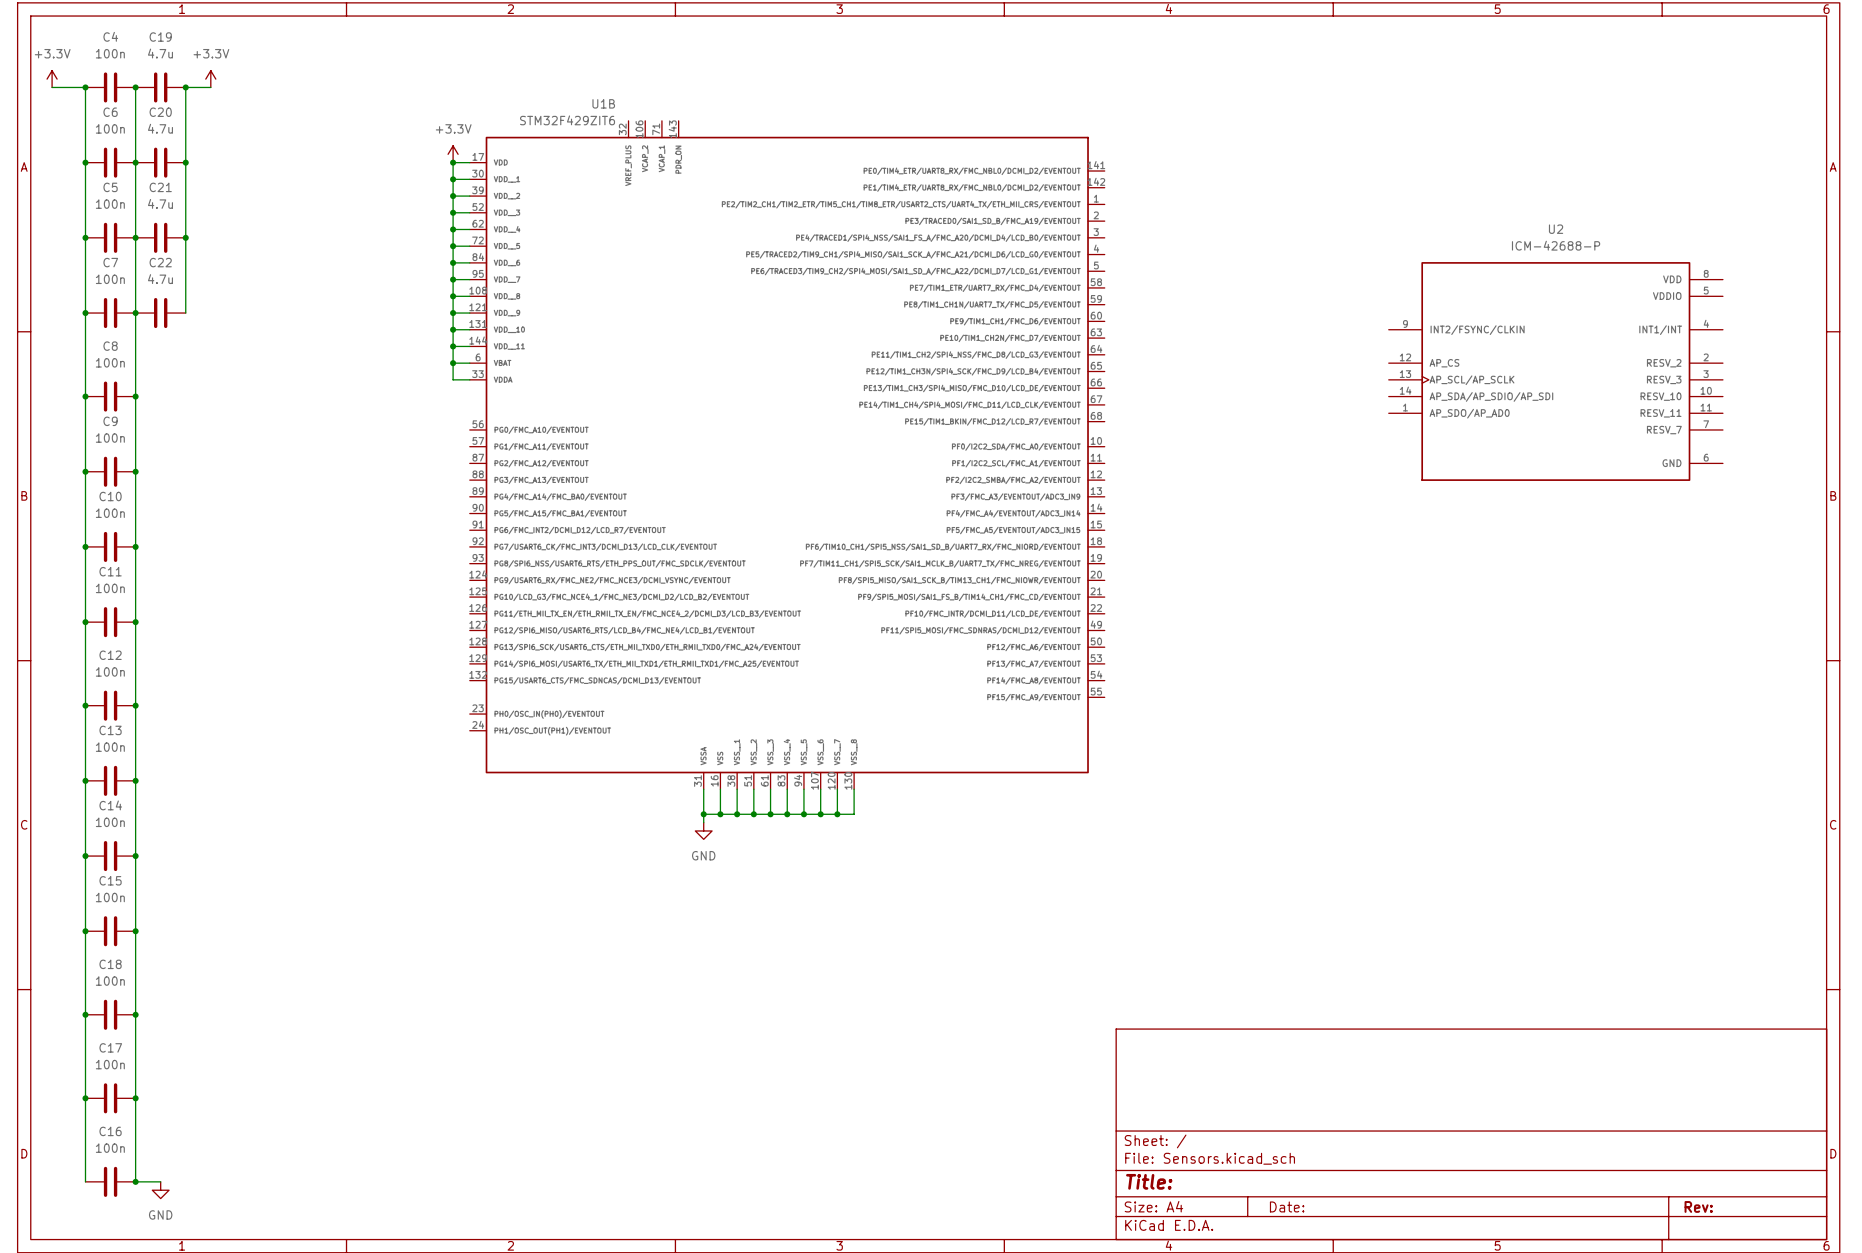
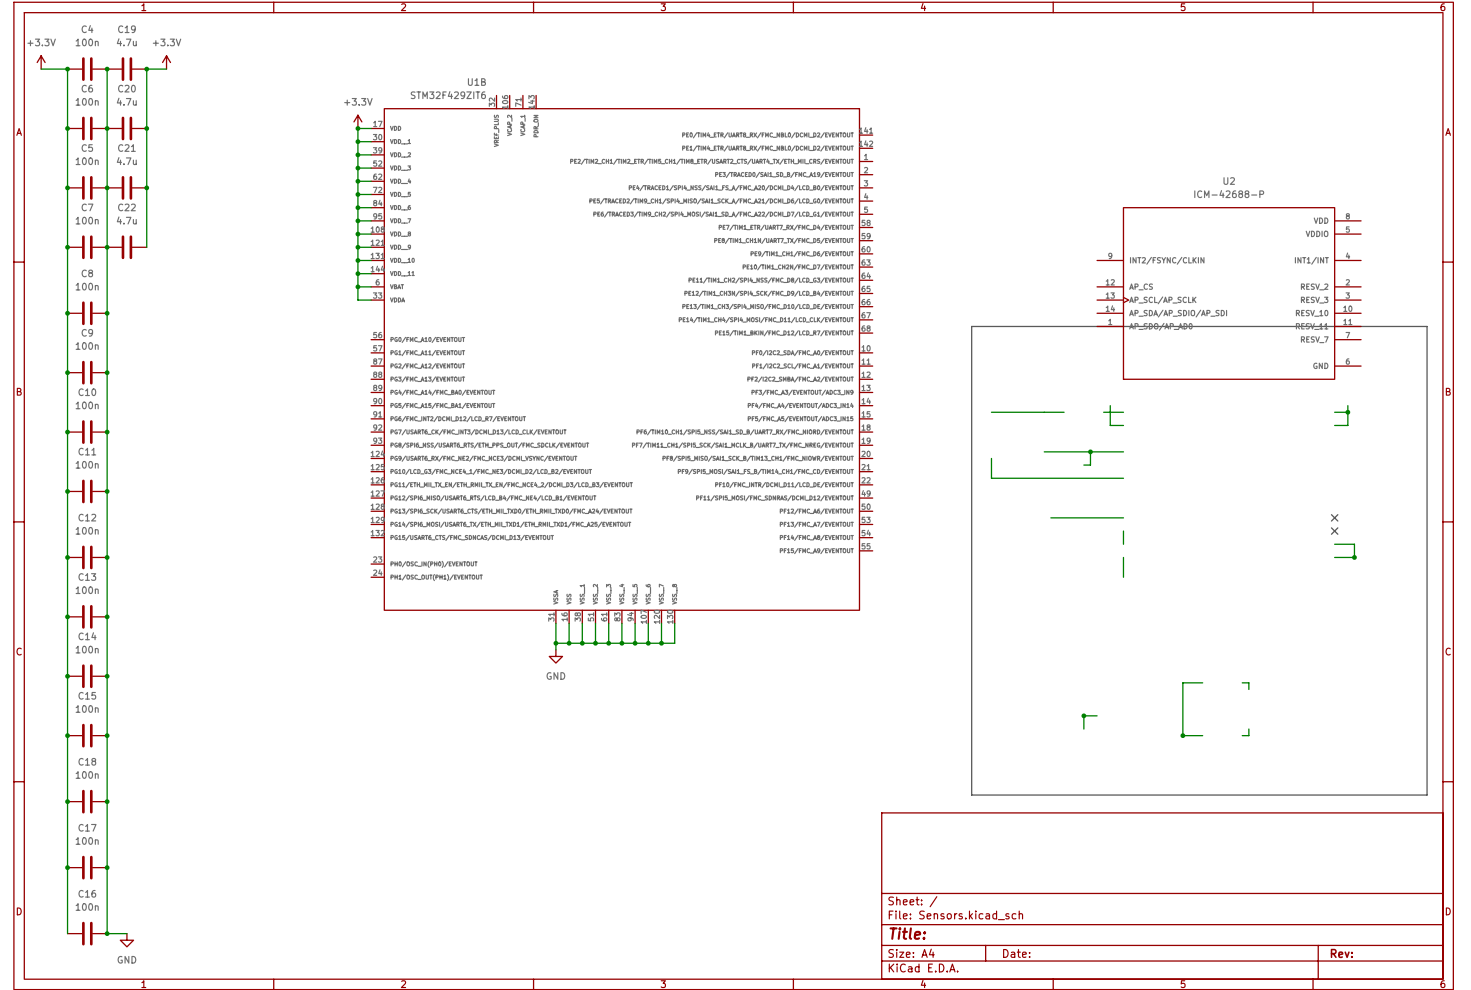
line: none -> (971, 326) (1427, 326) (1427, 795) (971, 795) (971, 326)
wire: none -> (1110, 405) (1110, 425) (1123, 425)
wire: none -> (1347, 405) (1347, 425) (1334, 425)
wire: none -> (991, 412) (1064, 412)
wire: none -> (1103, 412) (1123, 412)
wire: none -> (1334, 412) (1347, 412)
junction: none -> (1347, 412)
wire: none -> (1044, 451) (1123, 451)
wire: none -> (1090, 451) (1090, 465) (1083, 465)
junction: none -> (1090, 451)
wire: none -> (991, 458) (991, 478) (1123, 478)
wire: none -> (1050, 517) (1123, 517)
no-connect mark: none -> (1334, 517)
wire: none -> (1123, 531) (1123, 544)
no-connect mark: none -> (1334, 531)
wire: none -> (1334, 544) (1354, 544) (1354, 557) (1334, 557)
wire: none -> (1123, 557) (1123, 577)
junction: none -> (1354, 557)
wire: none -> (1202, 682) (1182, 682) (1182, 735) (1202, 735)
wire: none -> (1242, 682) (1248, 682) (1248, 689)
junction: none -> (1083, 715)
wire: none -> (1097, 715) (1083, 715) (1083, 729)
wire: none -> (1248, 729) (1248, 735) (1242, 735)
junction: none -> (1182, 735)

